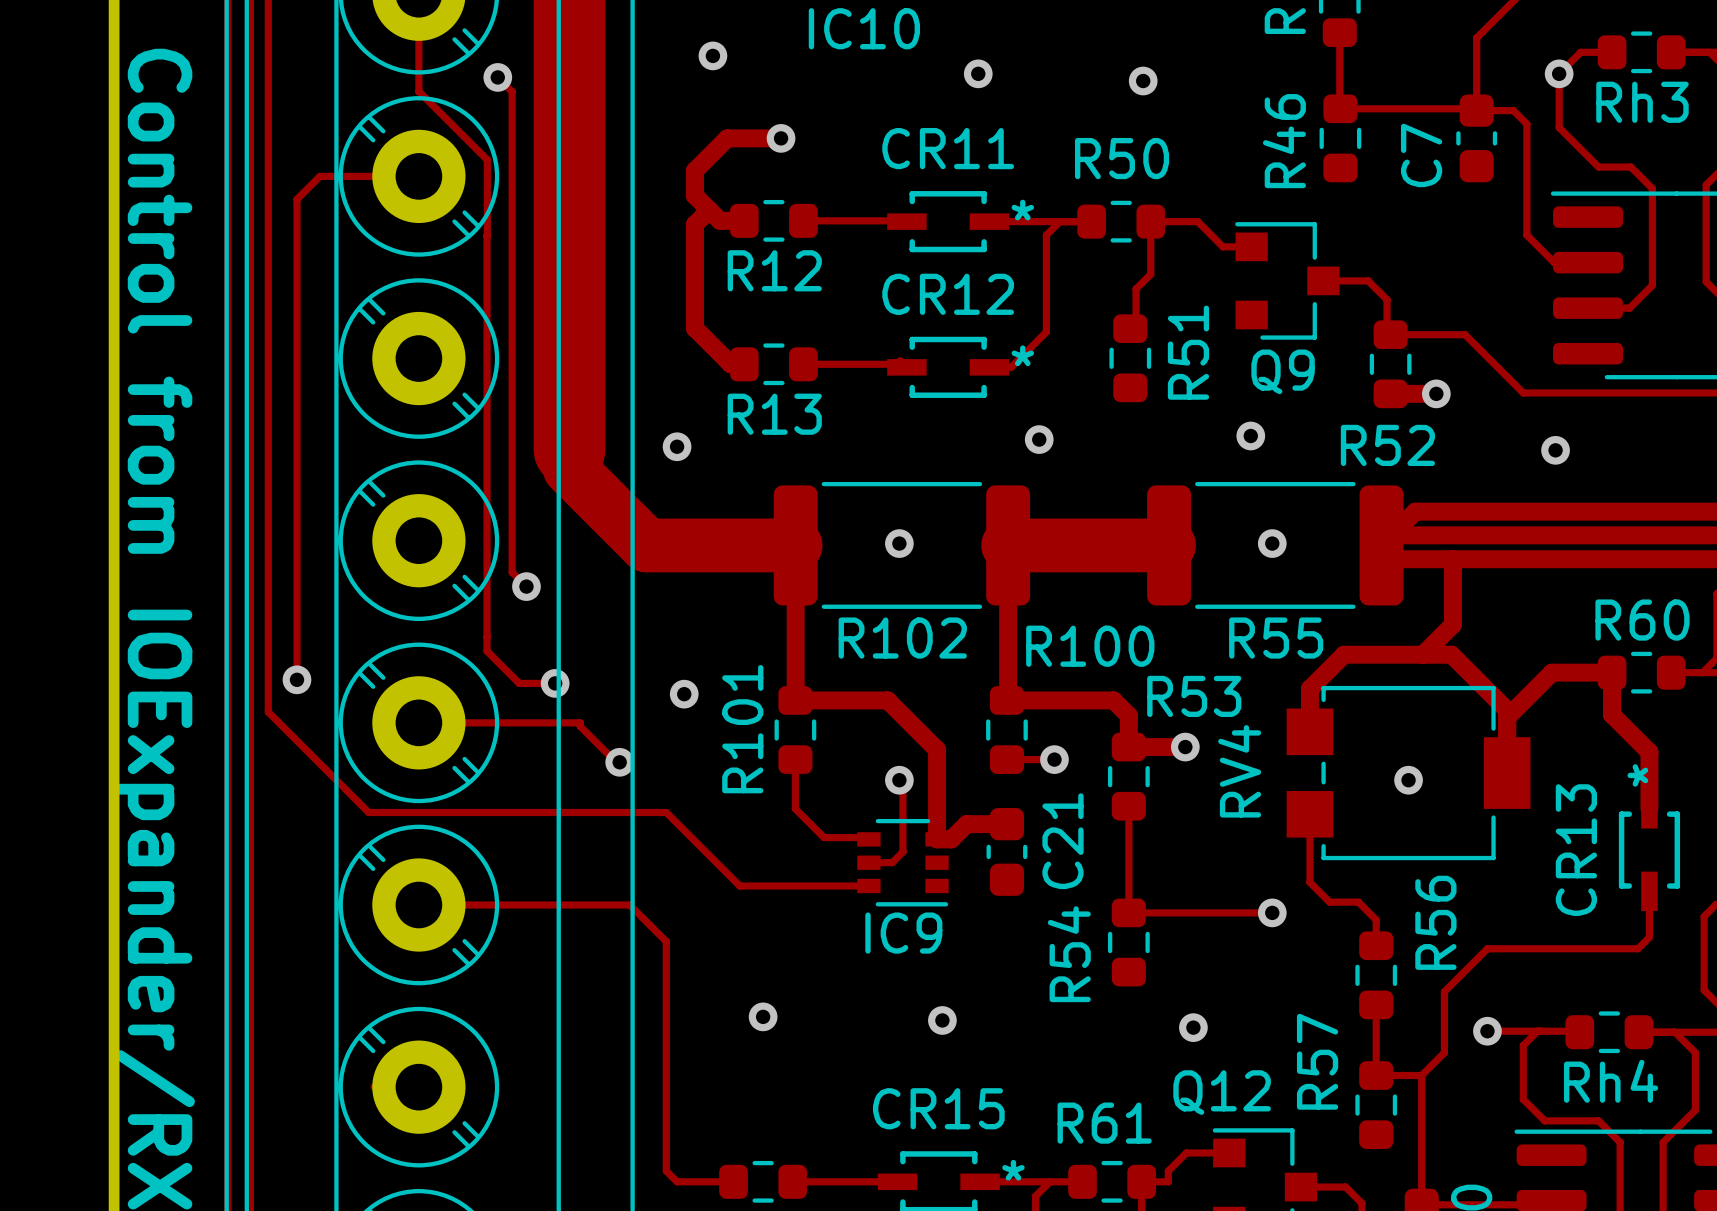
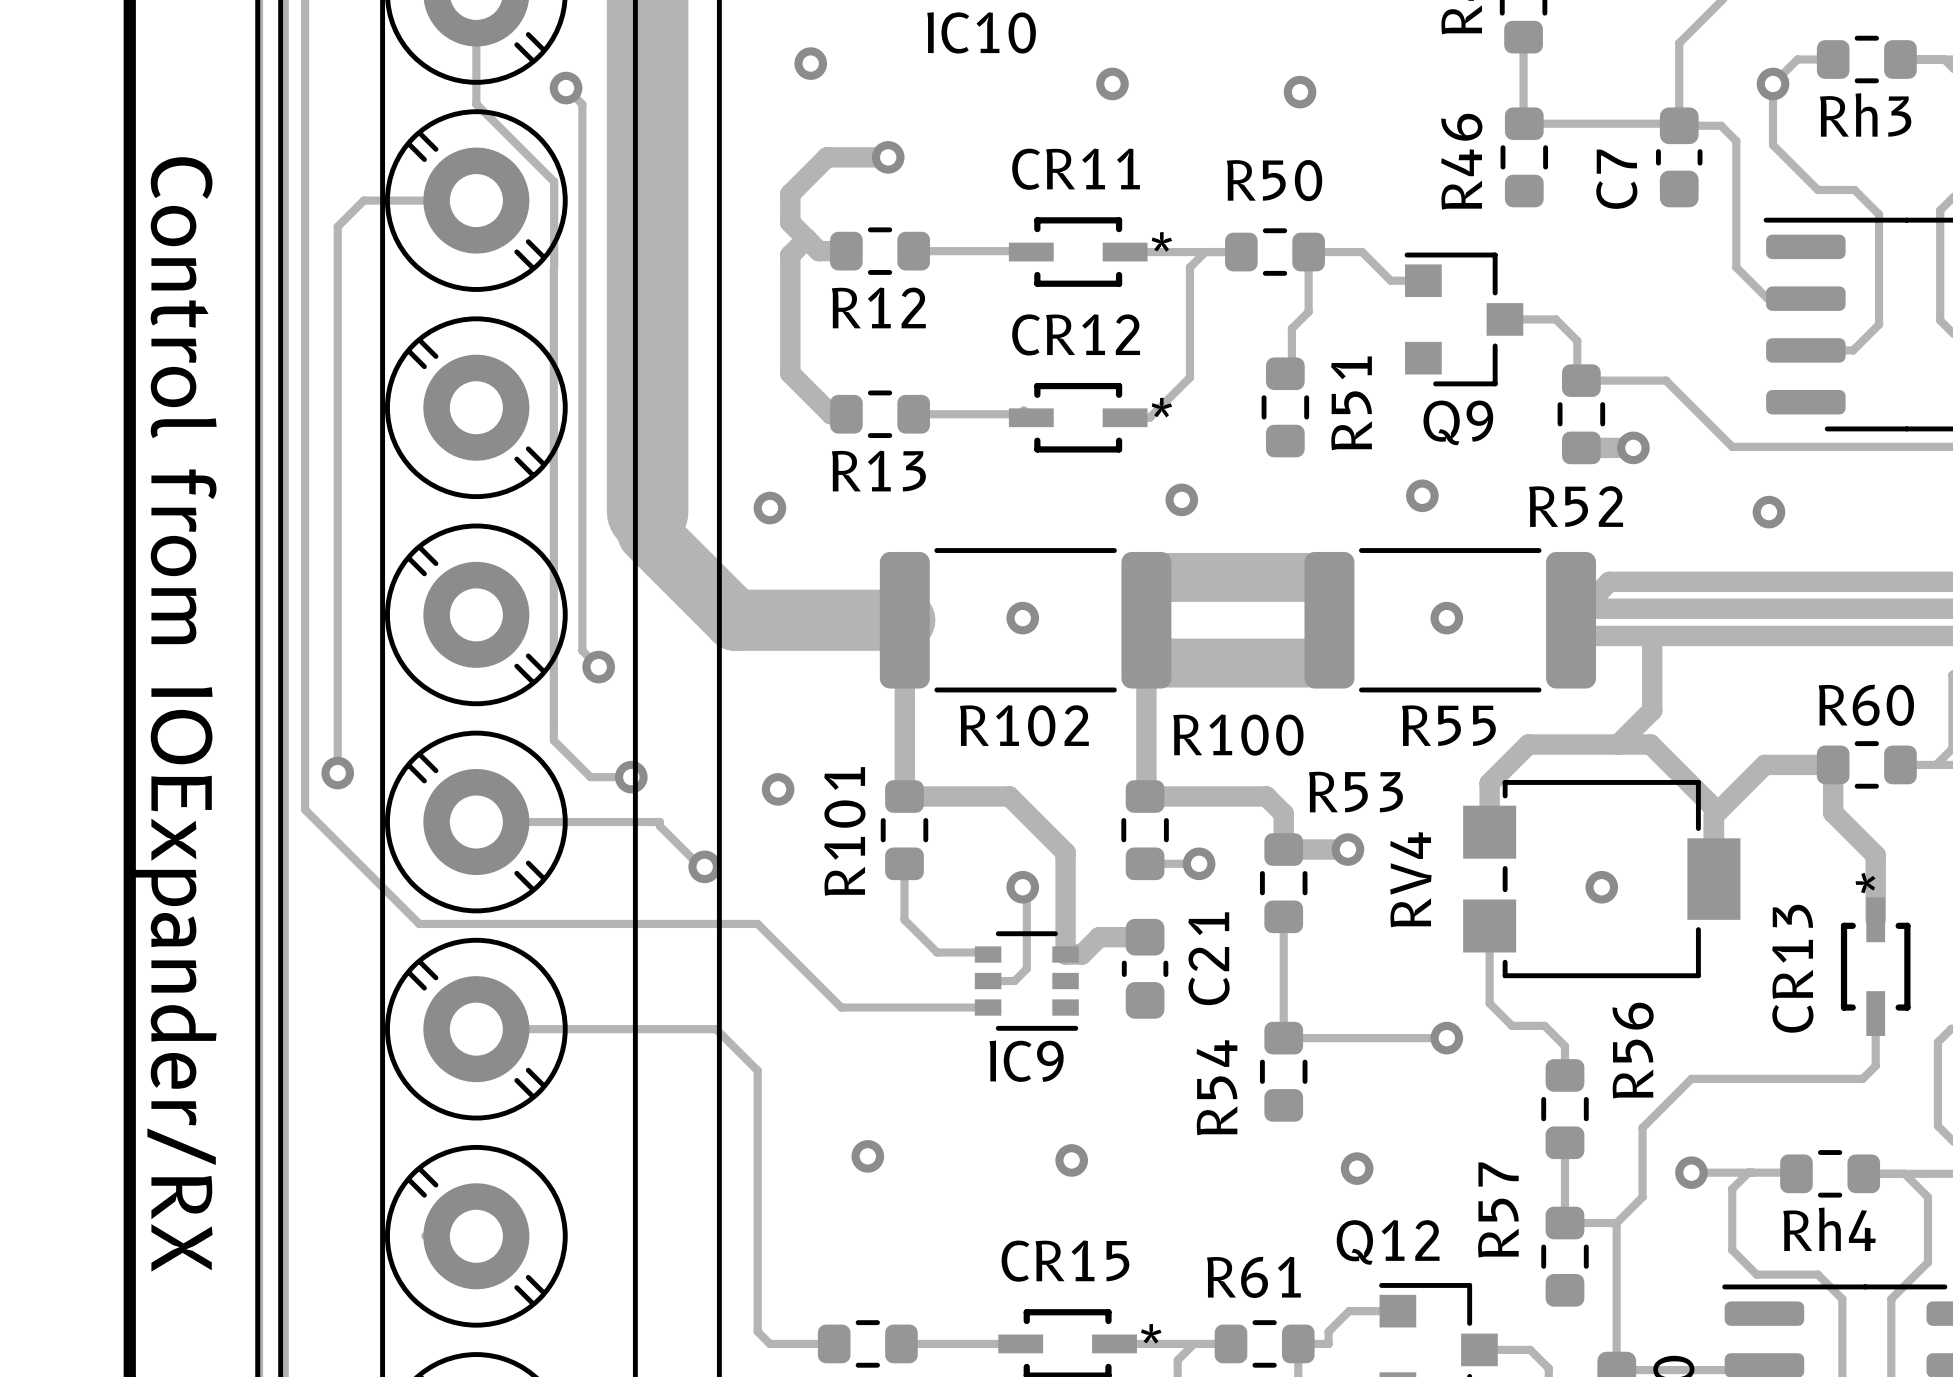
track: none -> (1158, 577) (1306, 577)
track: (1008, 545) (1169, 545) -> none
track: none -> (1158, 663) (1306, 663)

